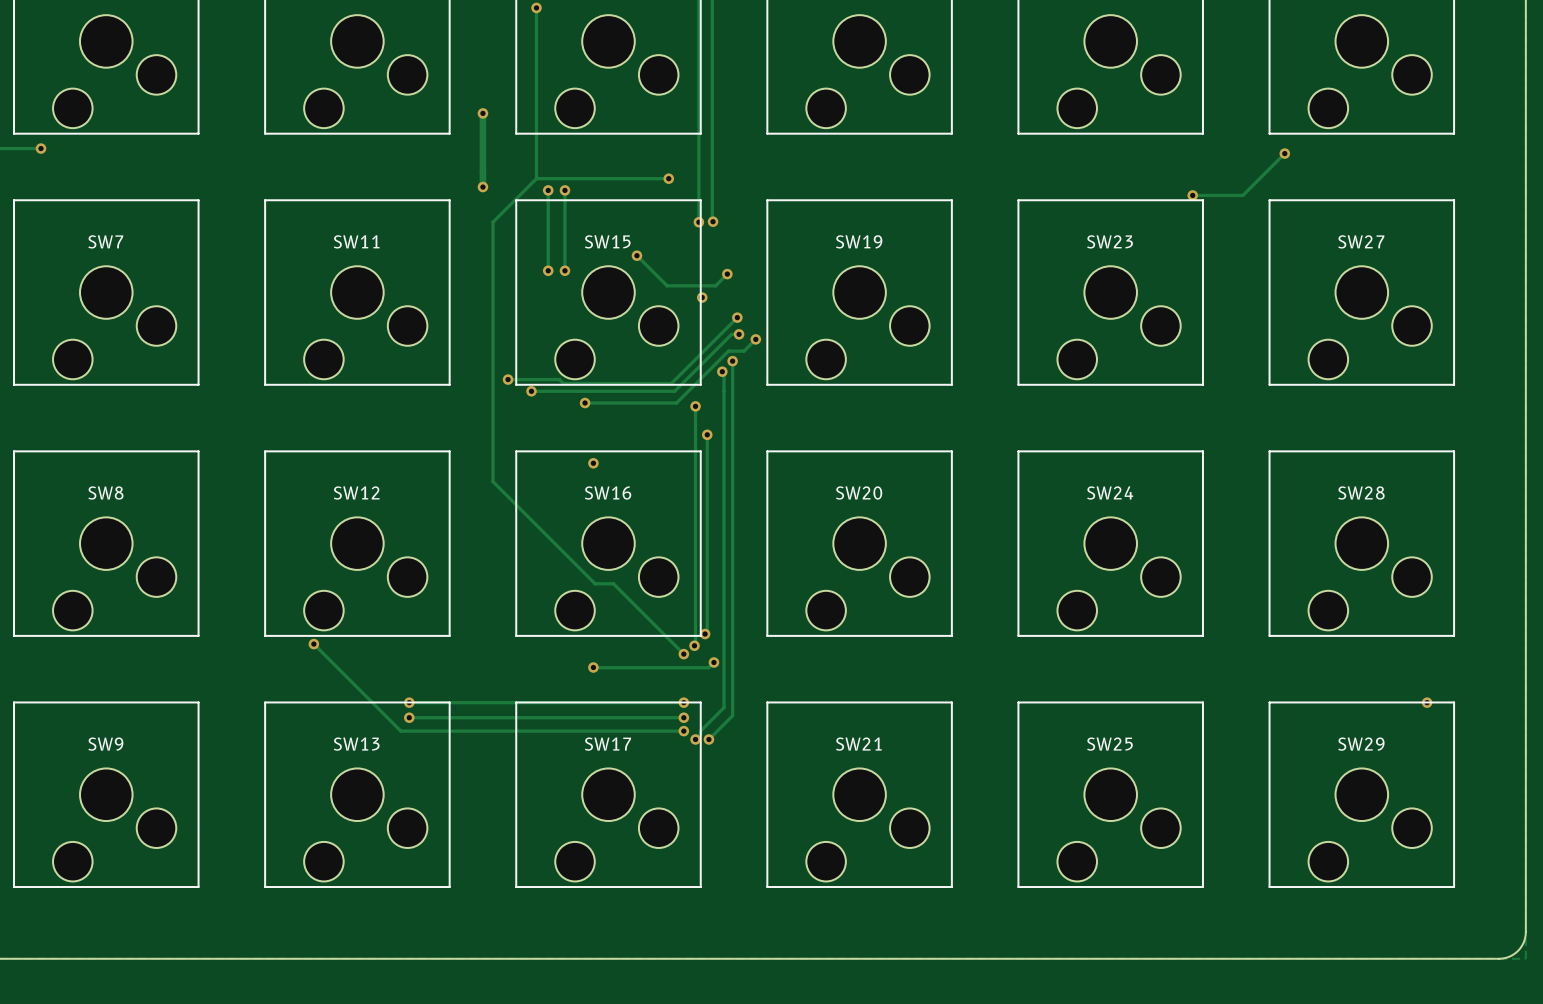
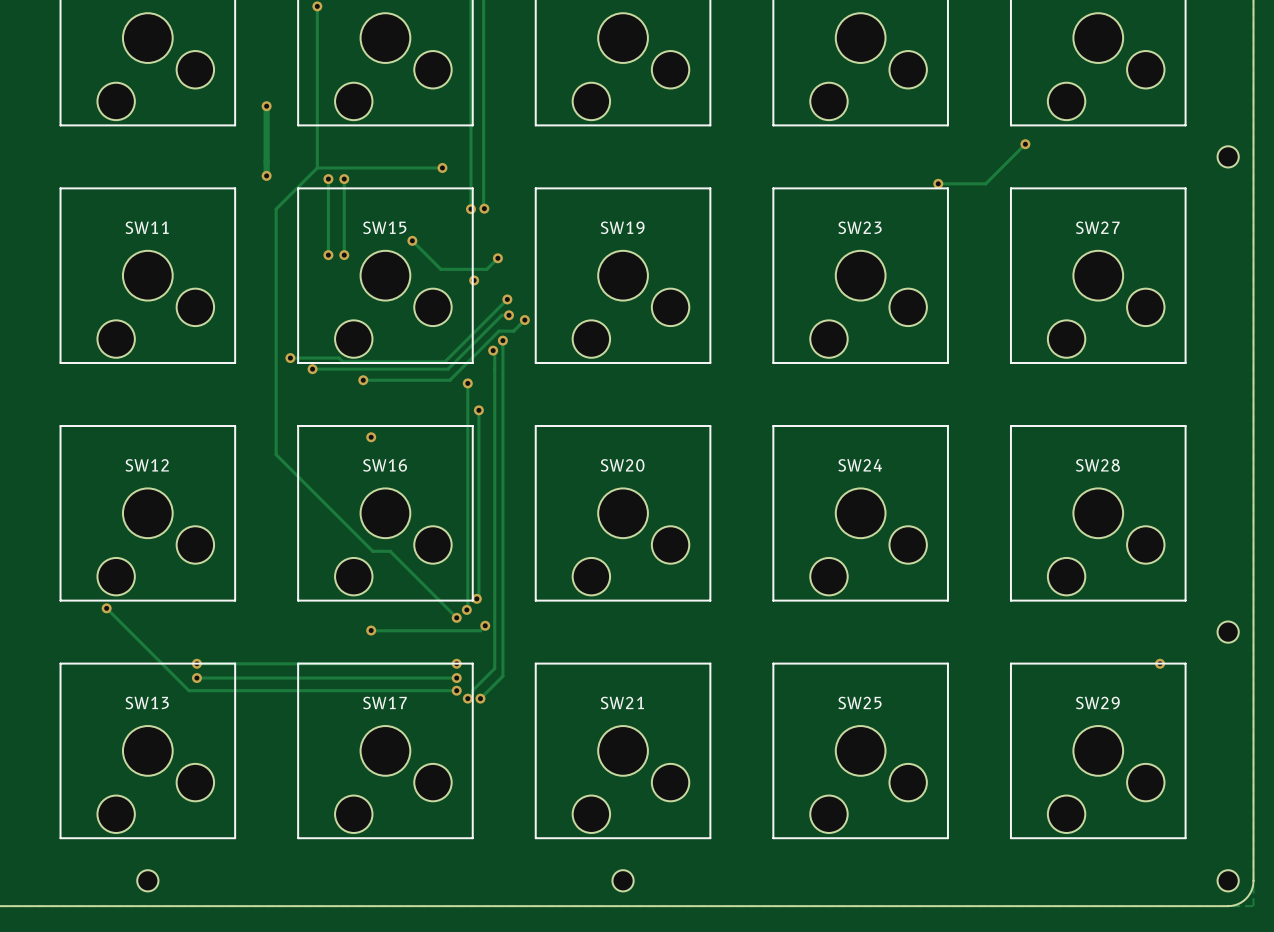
part: none -> (1228, 156)
part: none -> (1228, 632)
part: none -> (147, 880)
part: none -> (623, 880)
part: none -> (1228, 880)

